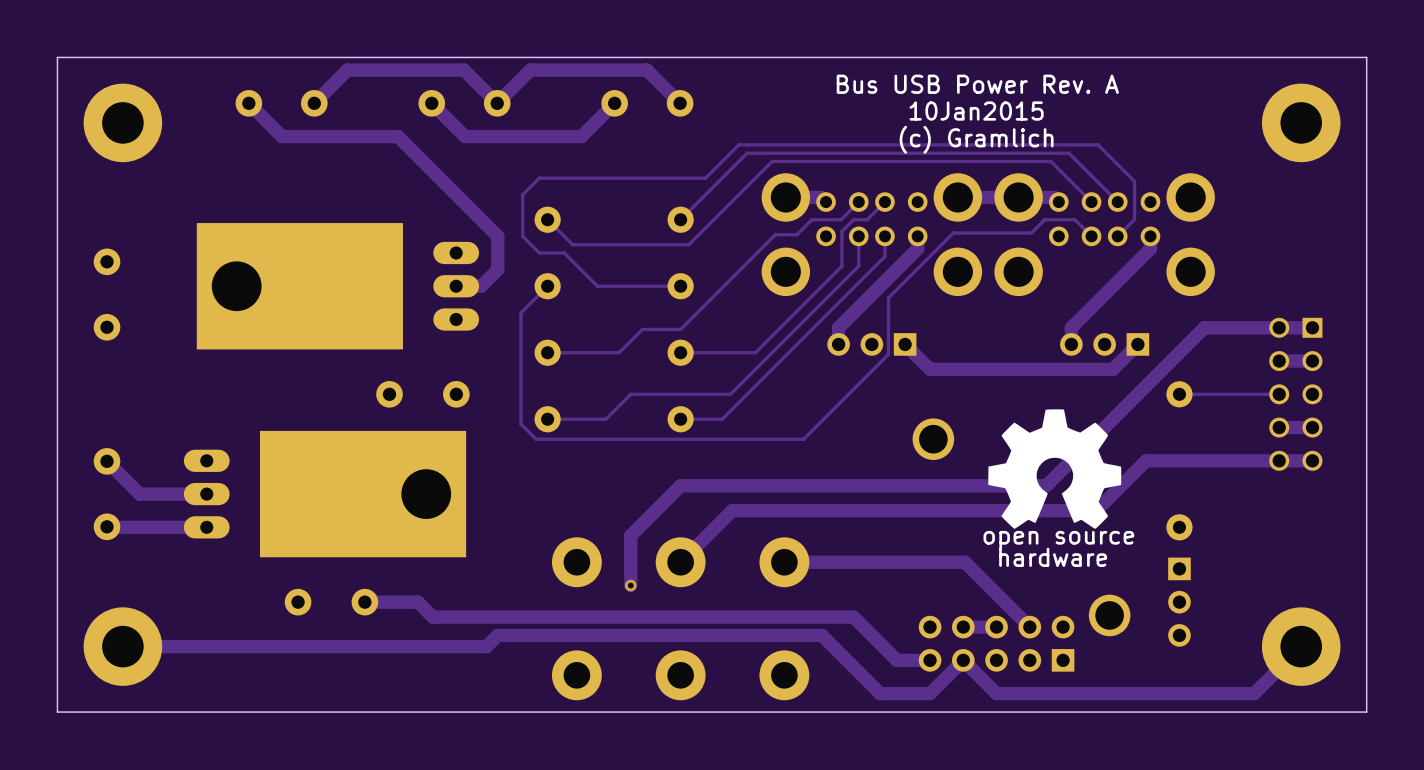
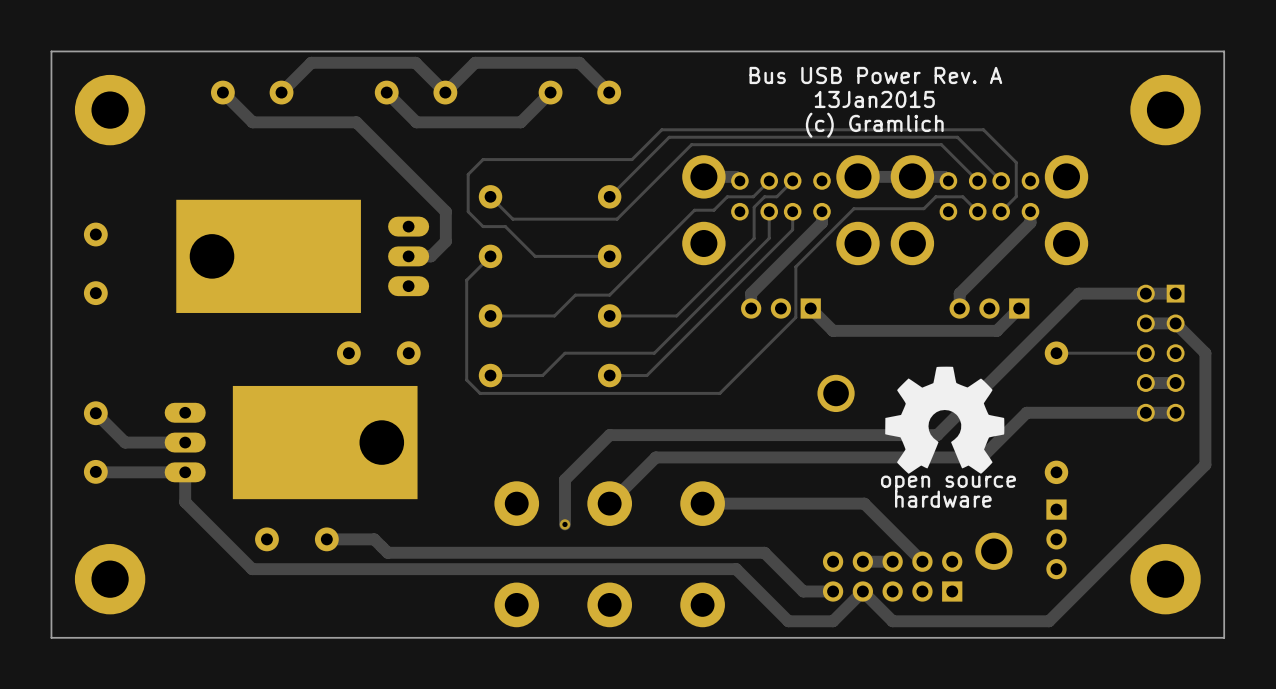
text: 10Jan2015 (976, 111) -> 13Jan2015 (874, 99)
track: (497, 635) (486, 646) (122, 646) -> (445, 569) (252, 569) (185, 502) (185, 472)
track: (1301, 646) (1254, 693) (1171, 693) -> (1175, 323) (1205, 353) (1205, 464) (1049, 621)

